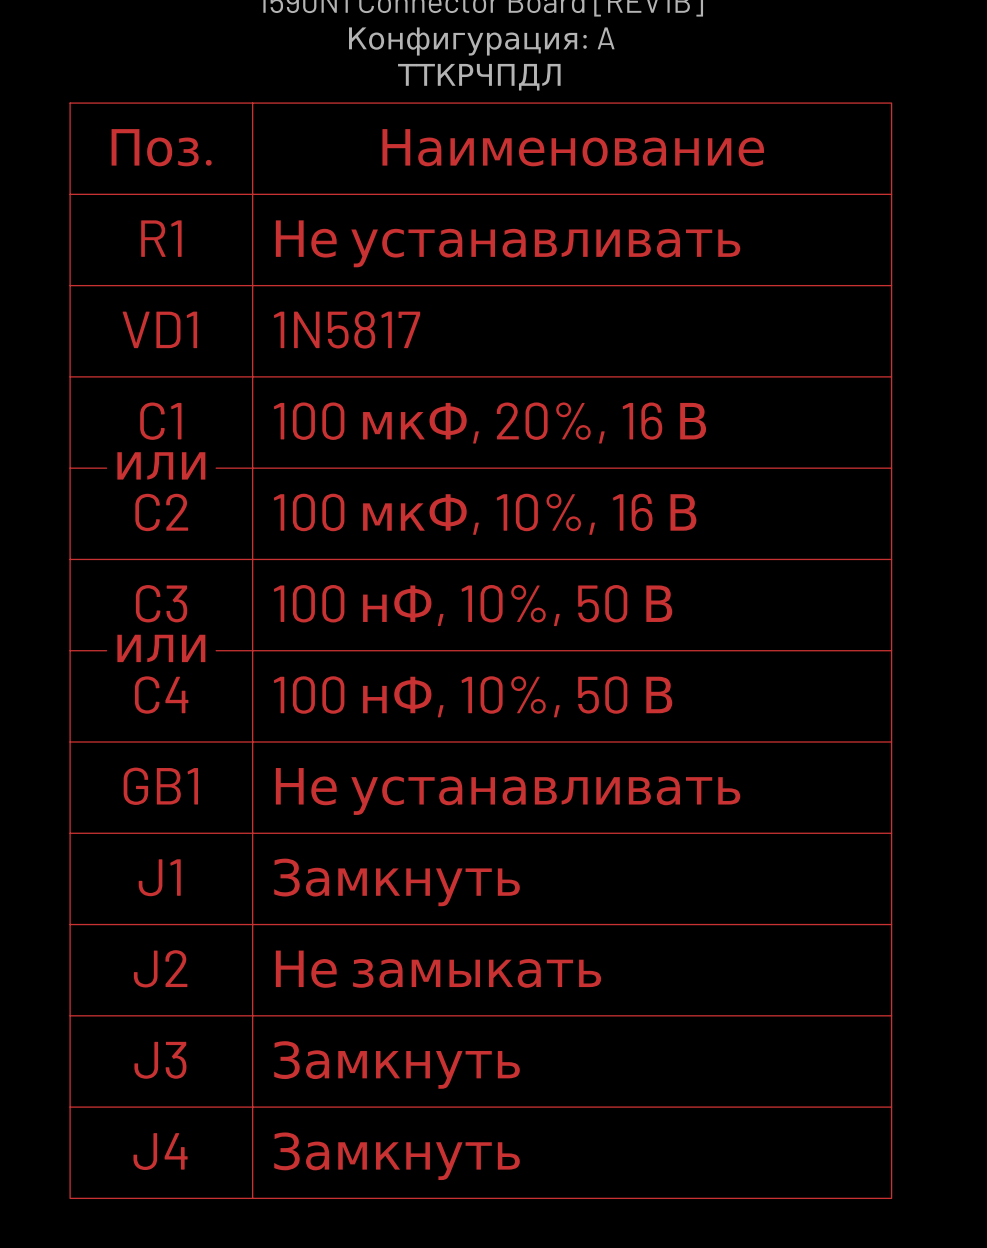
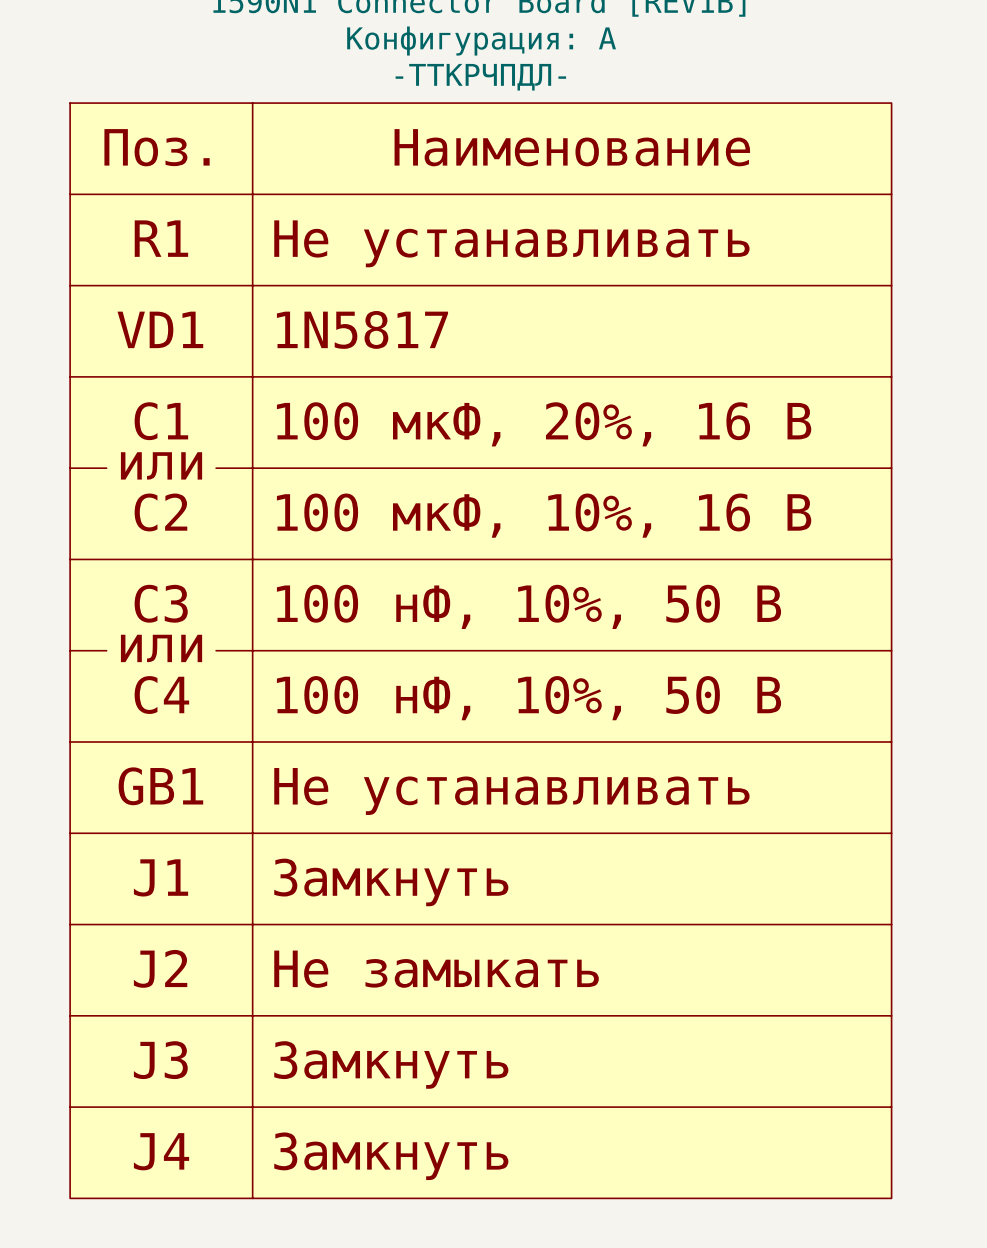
part text: ТТКРЧПДЛ (479, 77) -> -ТТКРЧПДЛ- (480, 77)

